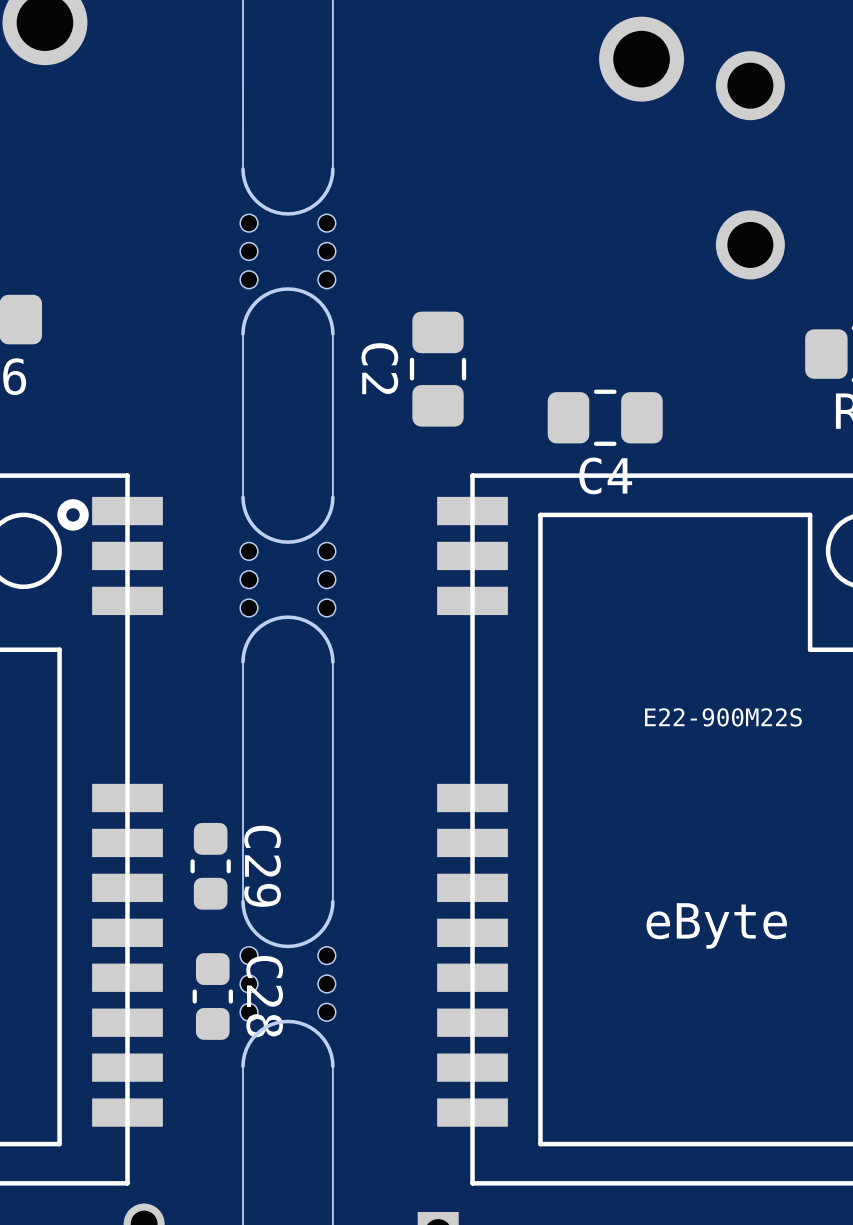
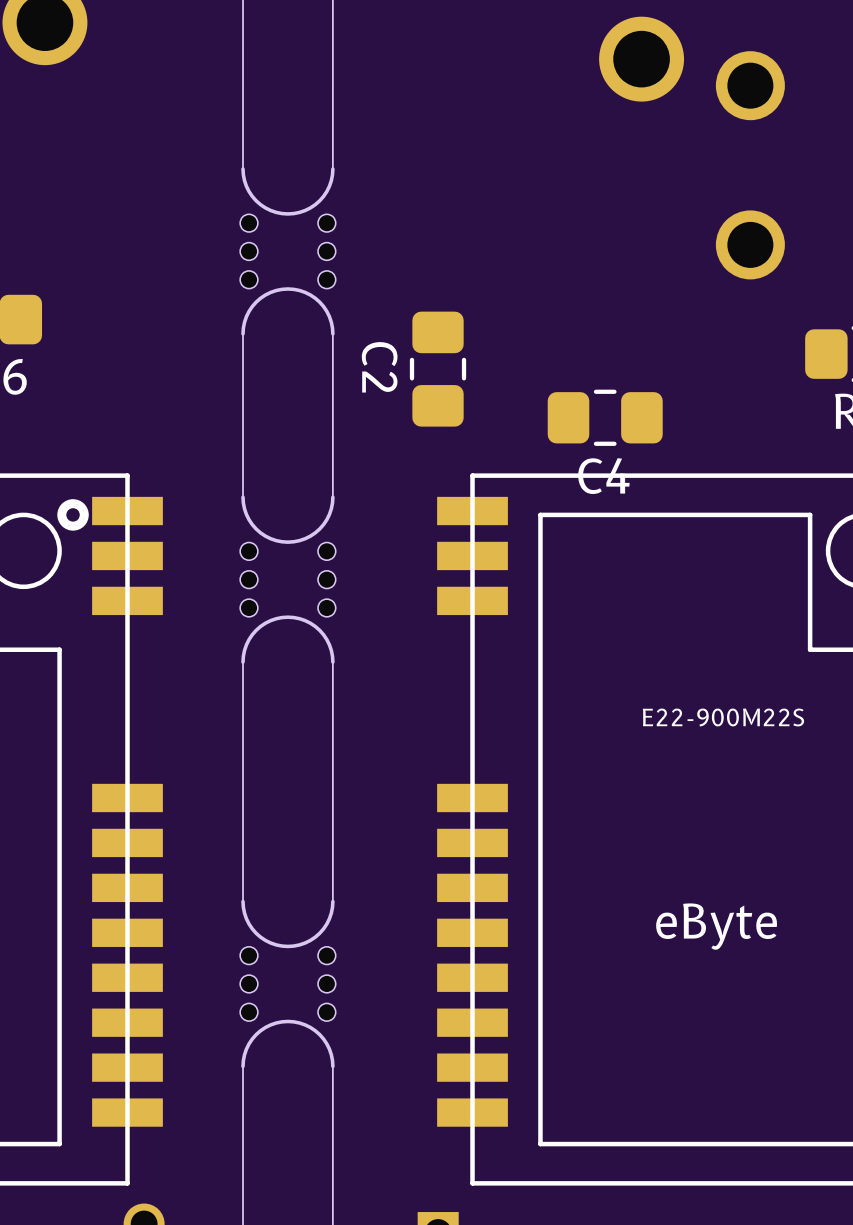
C29: (210, 866) -> none
C28: (212, 996) -> none

